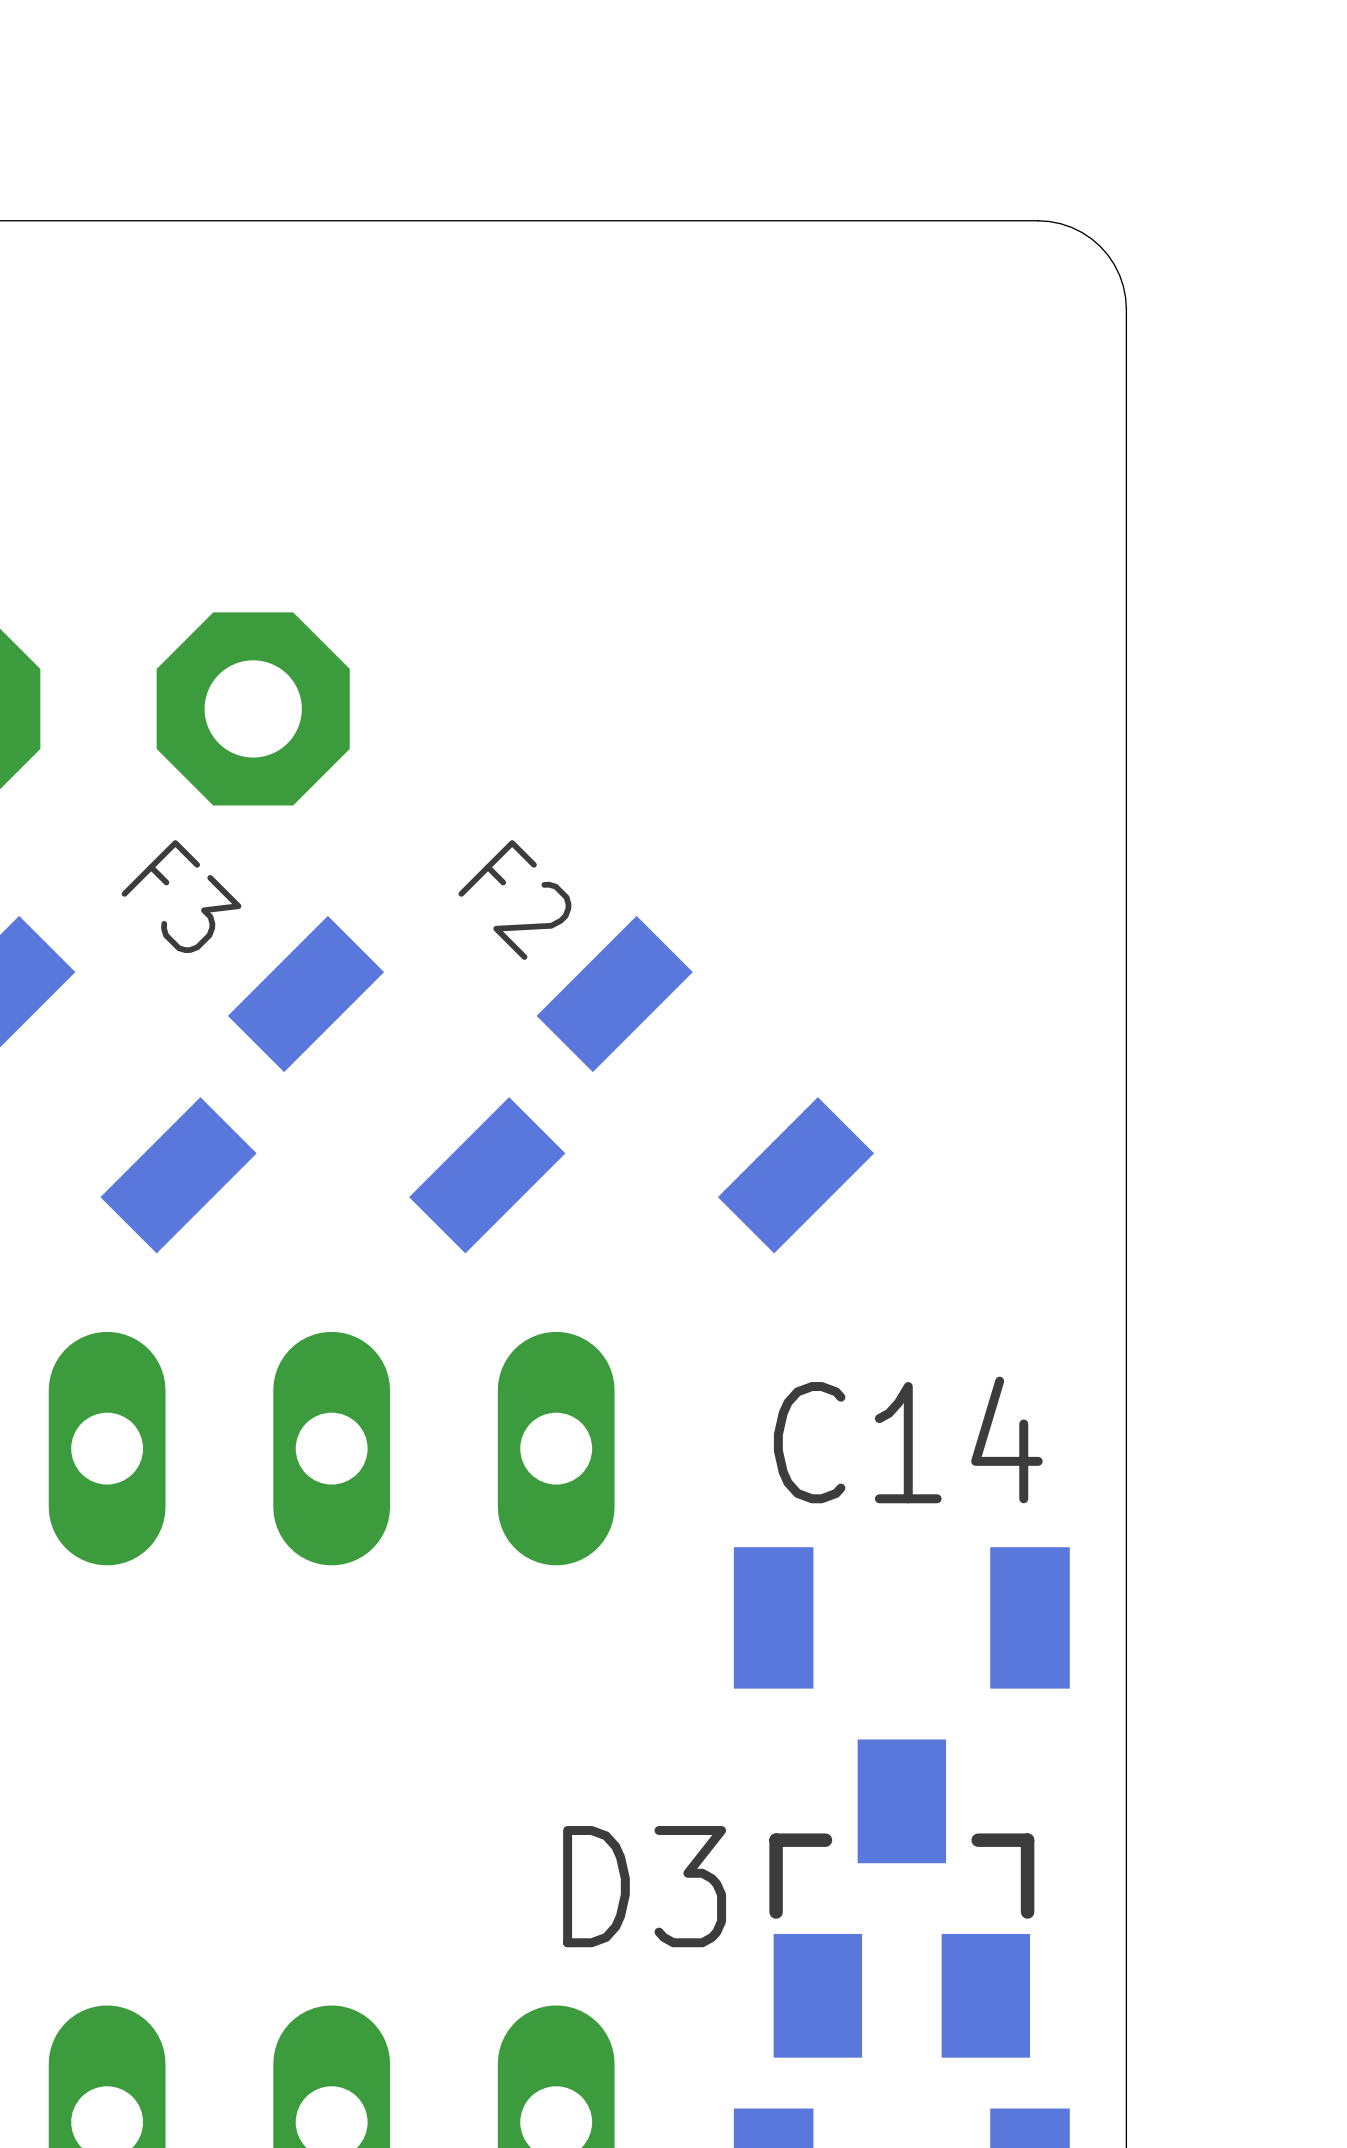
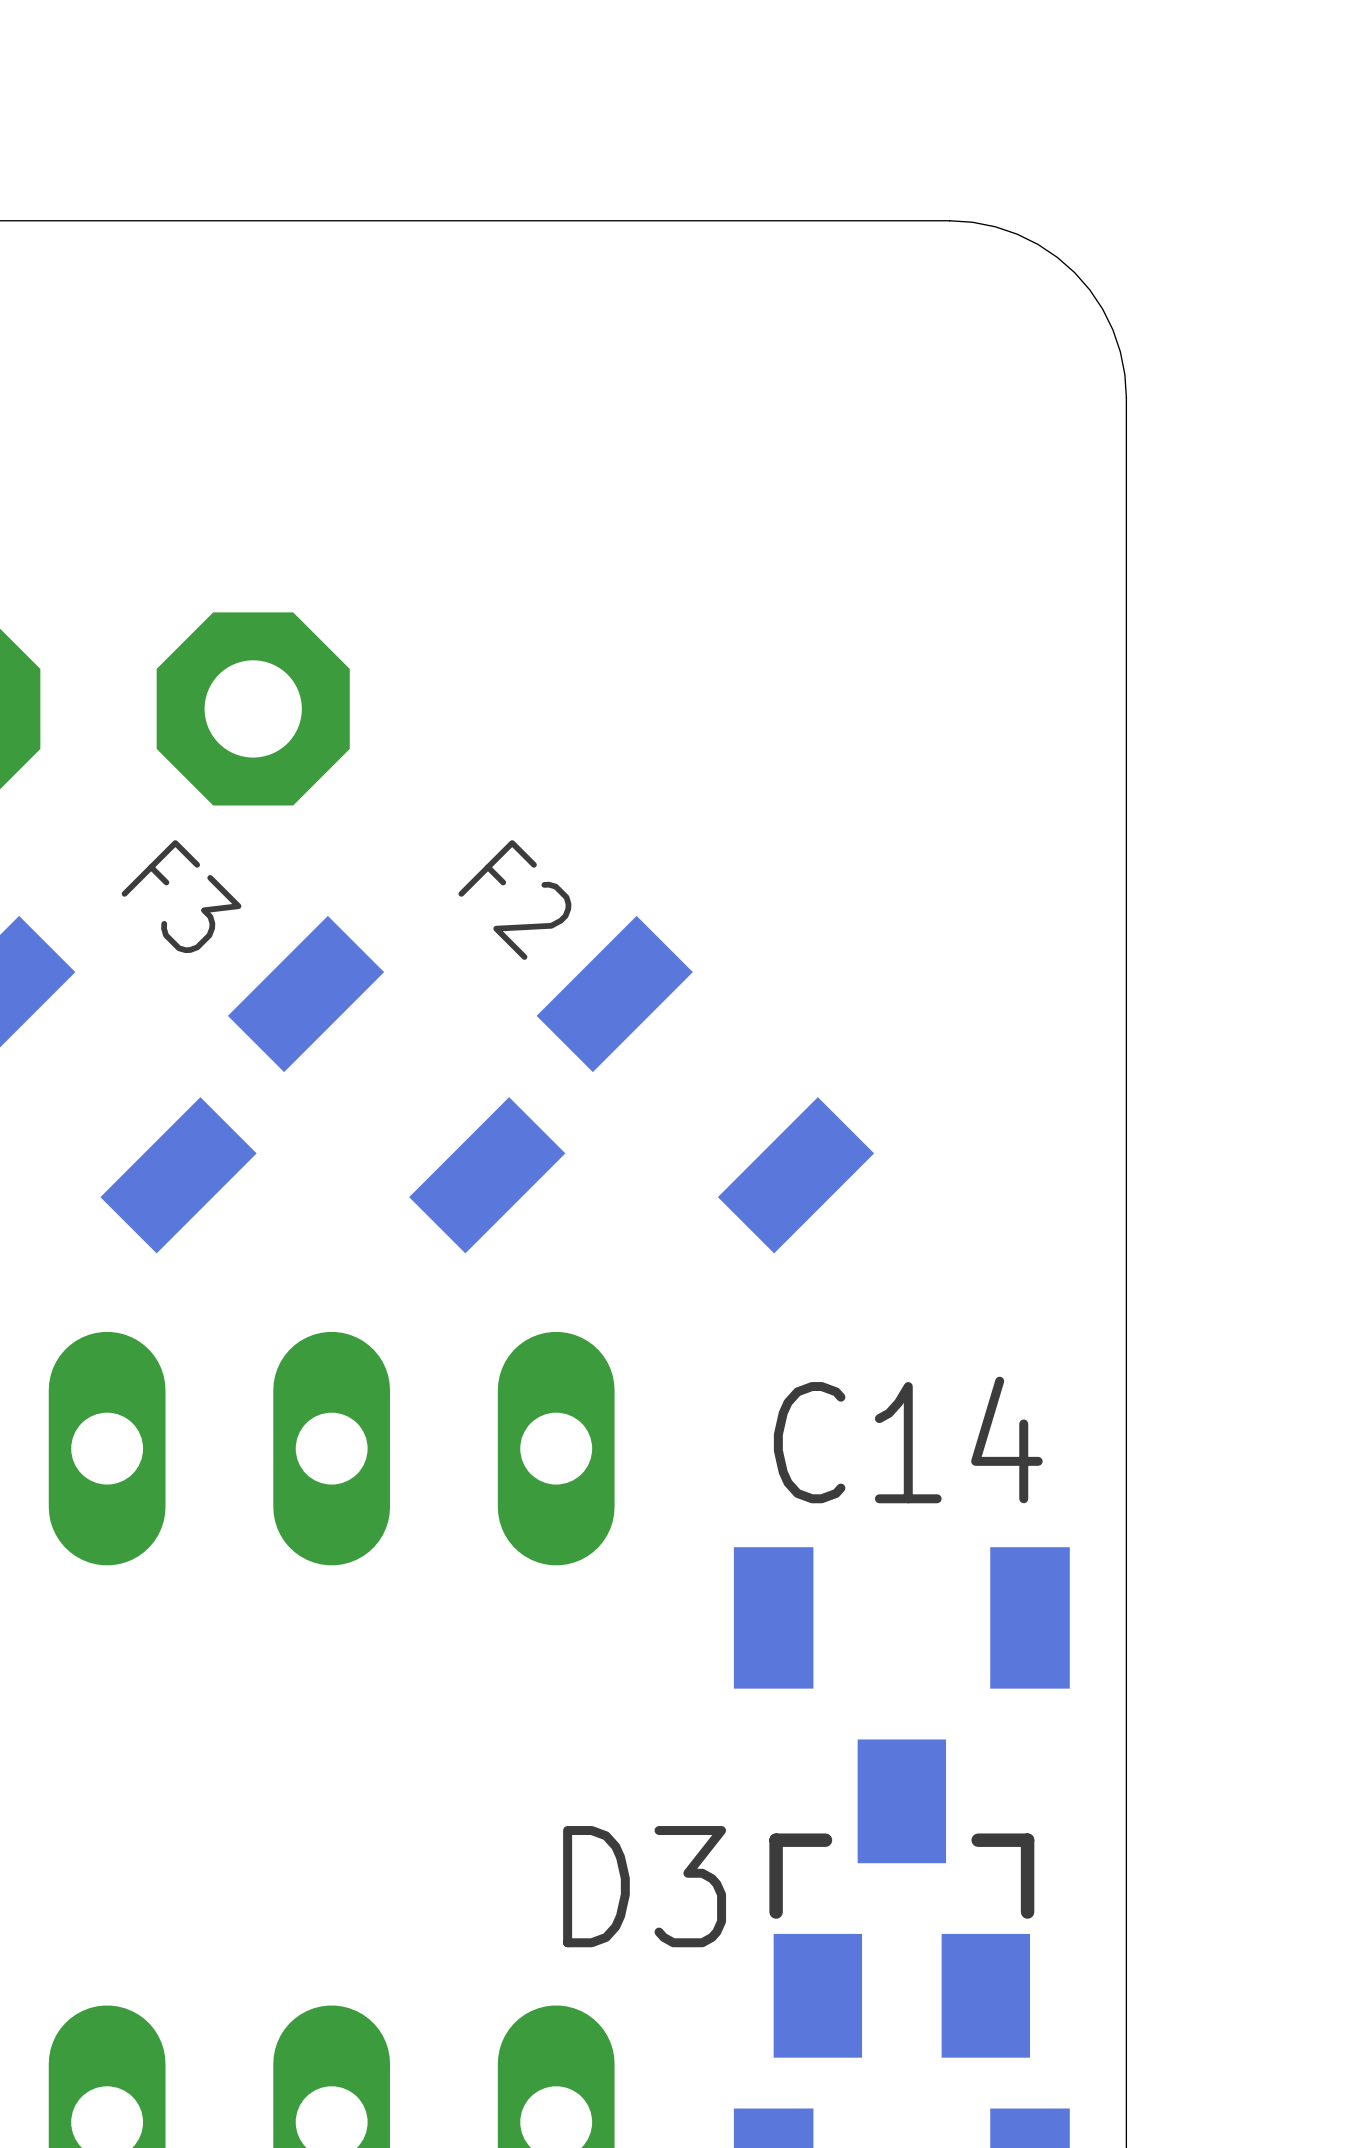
board edge: (949, 220) (1049, 221) (1071, 227) (1091, 239) (1100, 246) (1108, 255) (1119, 275) (1125, 297) (1126, 397) -> (949, 220) (972, 222) (995, 226) (1017, 234) (1037, 244) (1057, 257) (1074, 272) (1089, 289) (1102, 309) (1112, 329) (1120, 351) (1124, 374) (1126, 397)

